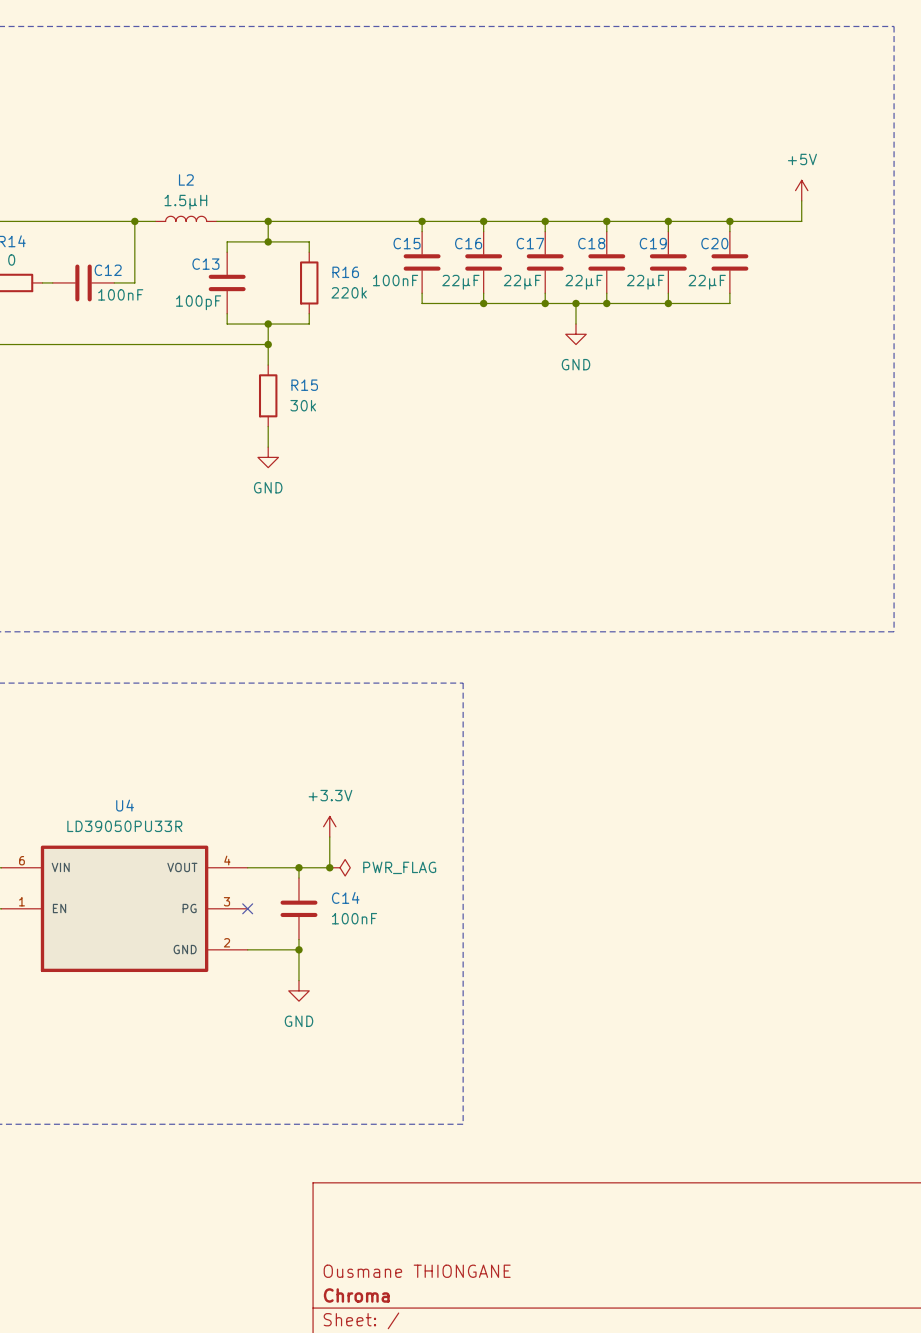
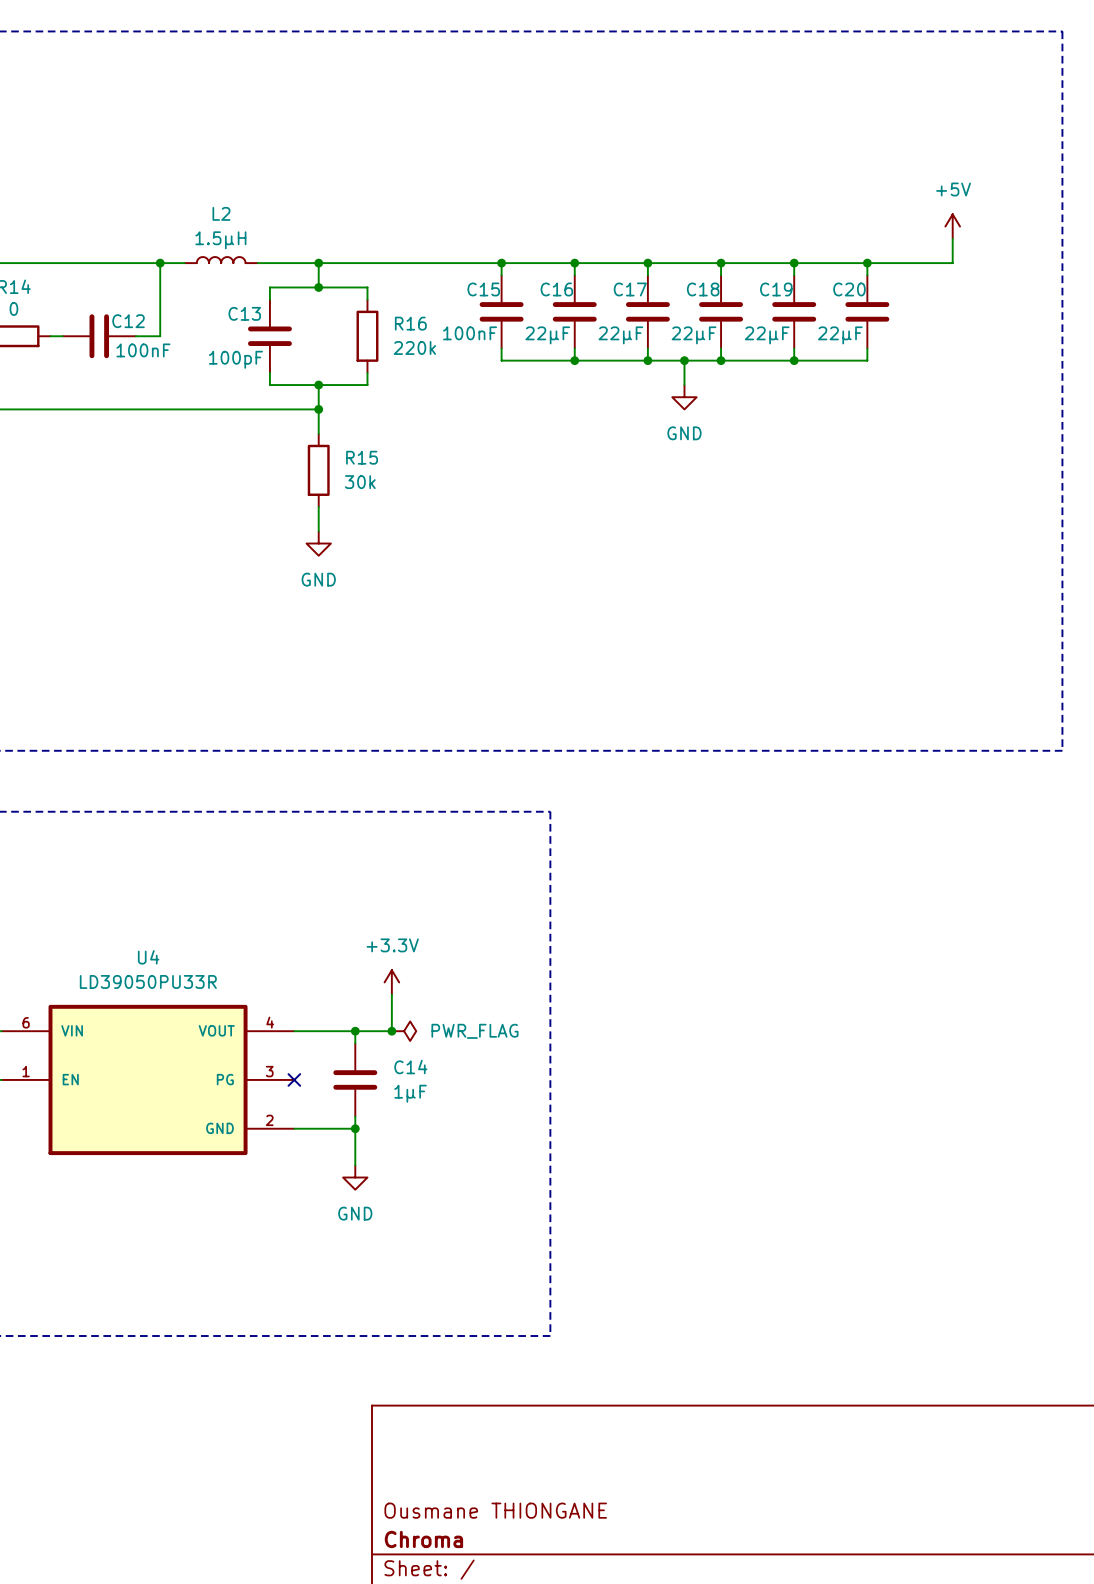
C14 value: 100nF (354, 918) -> 1µF (410, 1093)

